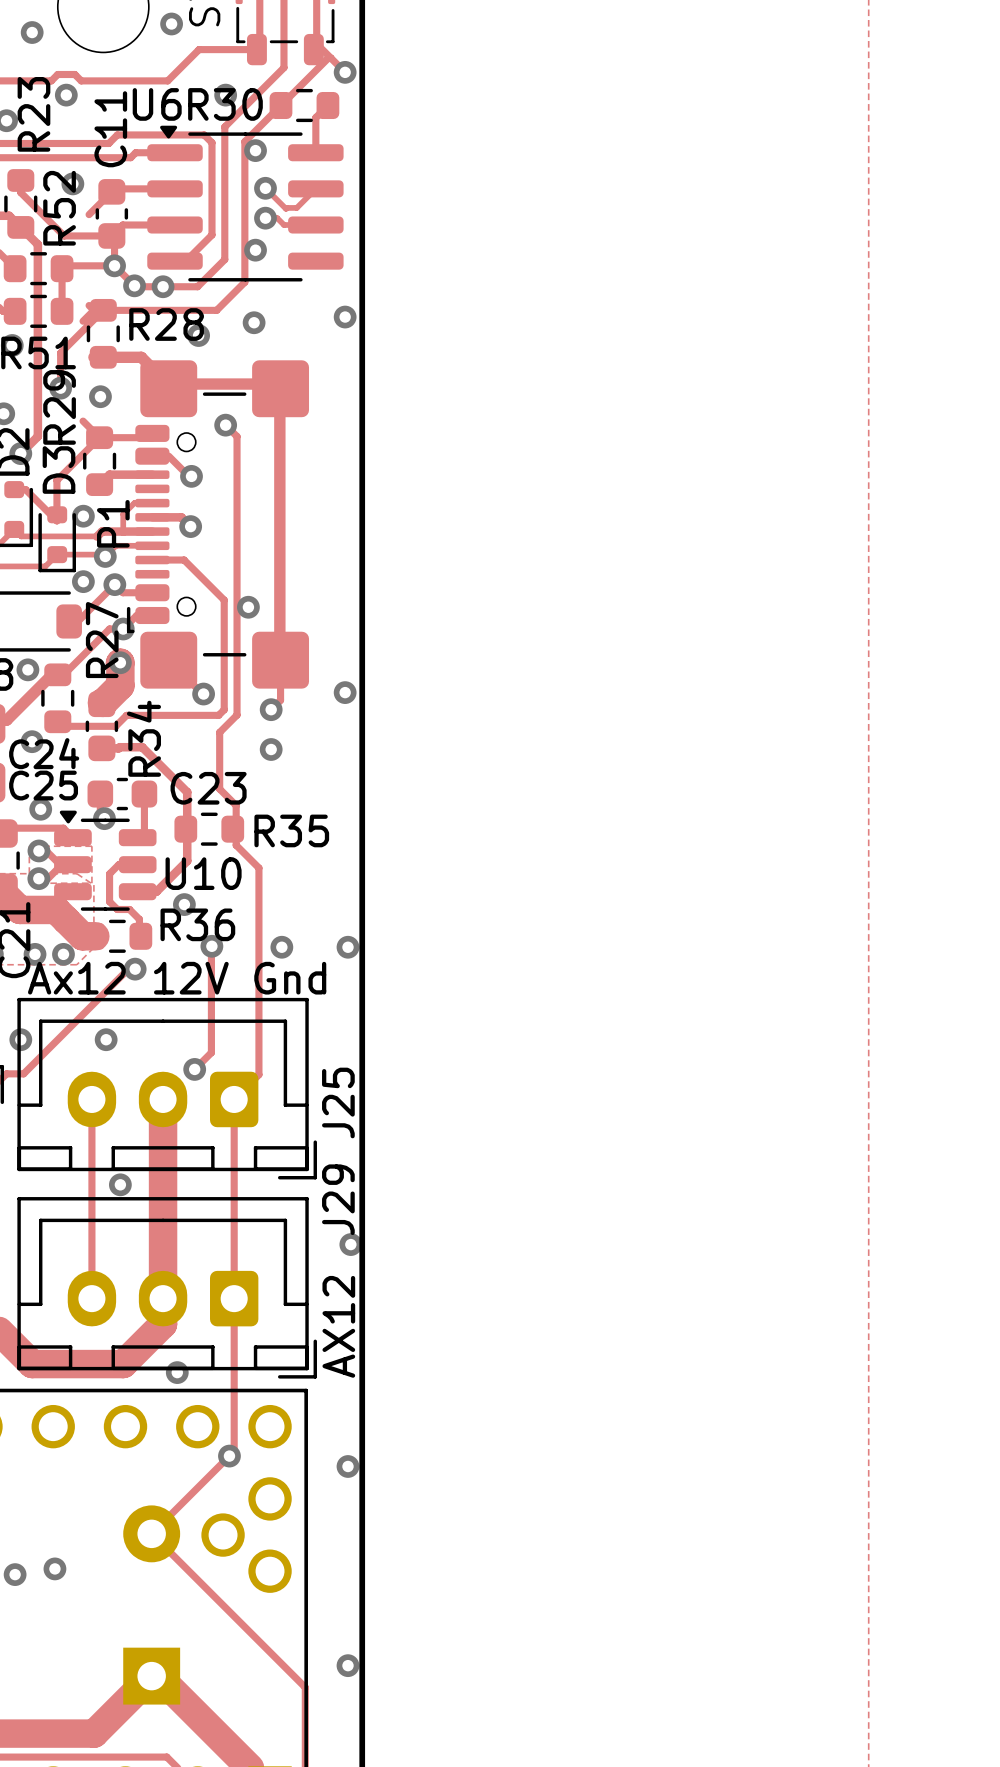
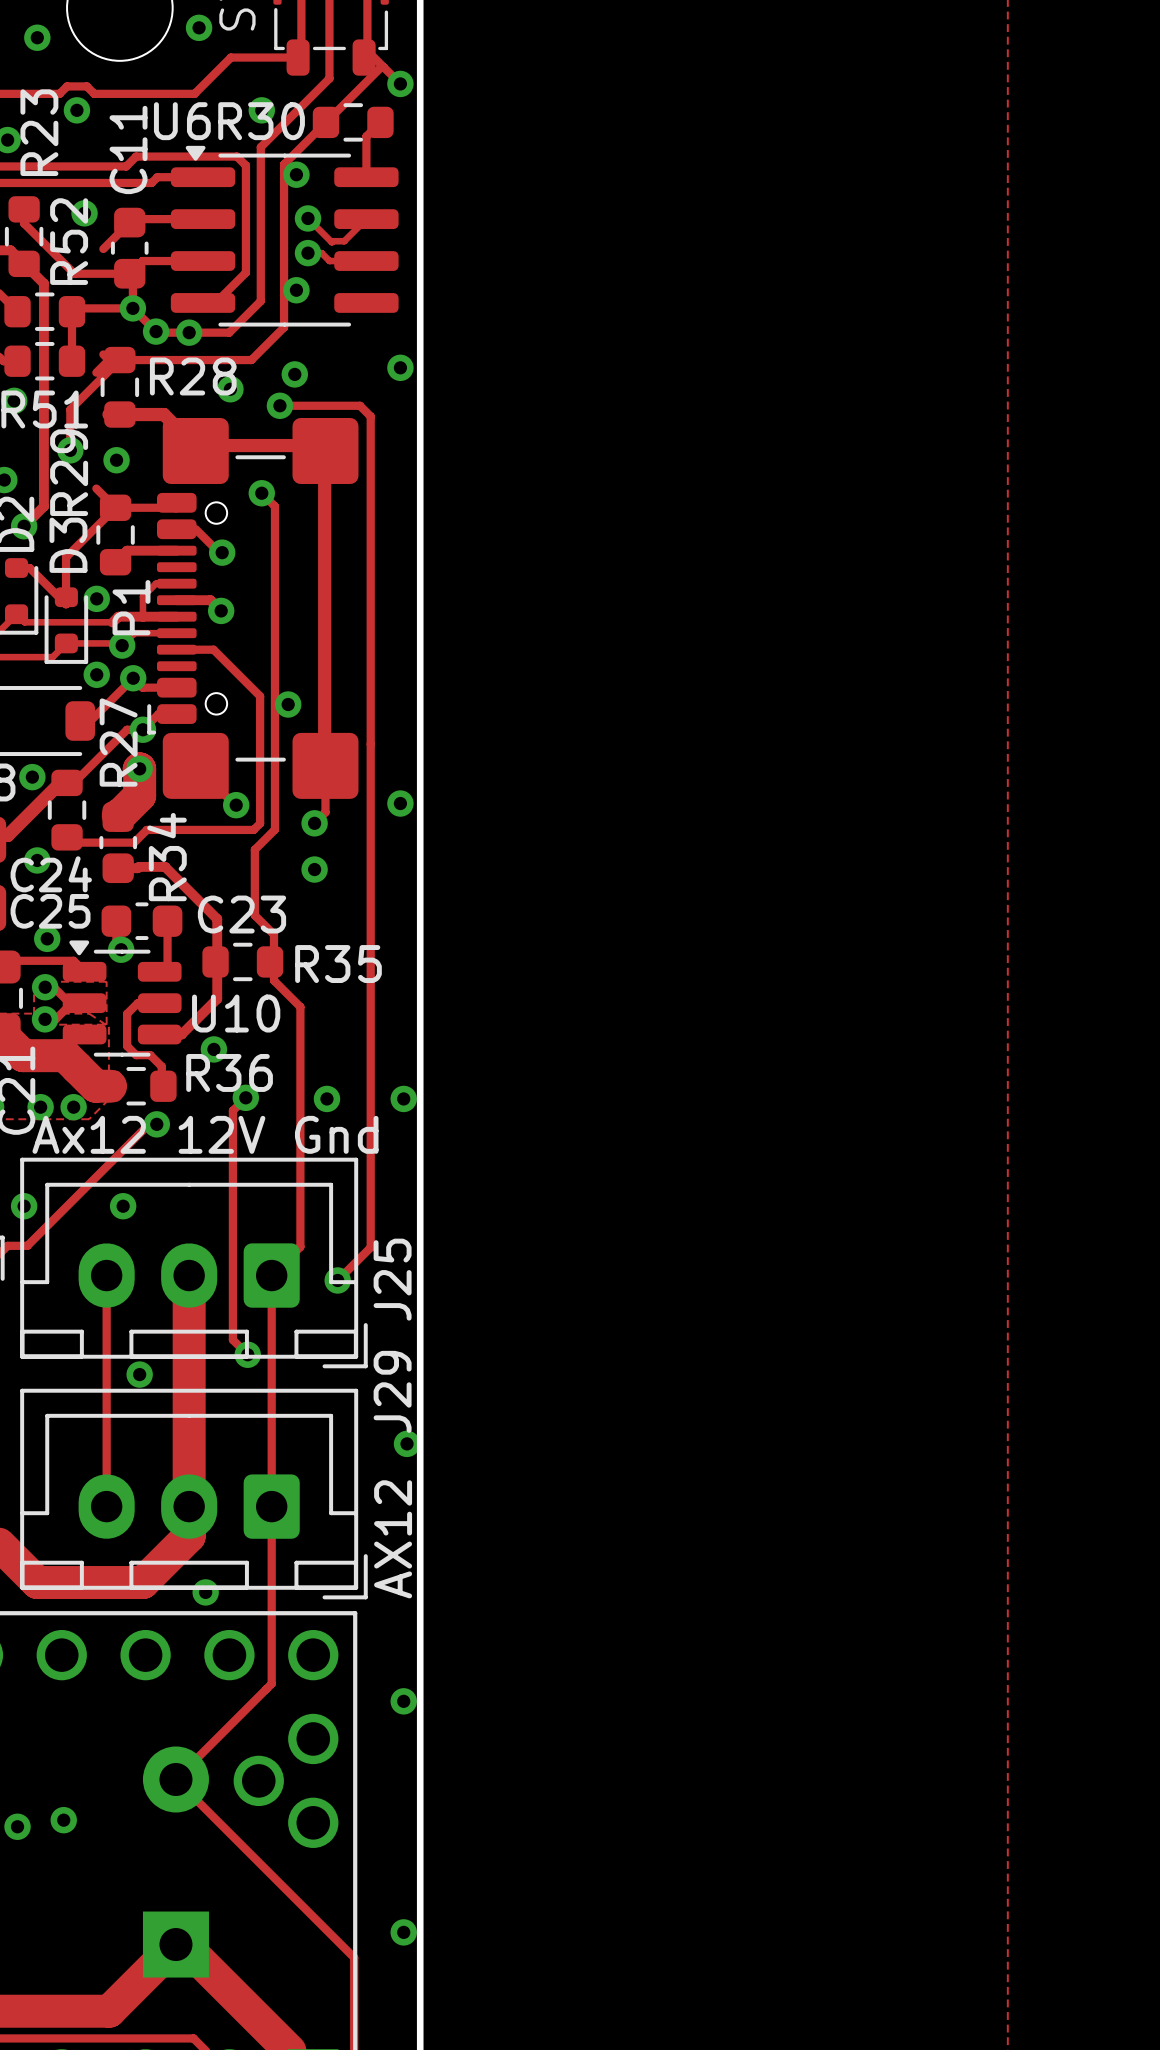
track: none -> (279, 405) (360, 405) (370, 416) (370, 1247) (337, 1280)
via: none -> (279, 405)
track: (211, 946) (211, 1052) (194, 1069) -> (245, 1098) (232, 1110) (232, 1339) (247, 1354)
via: (194, 1069) -> none
via: none -> (337, 1280)
via: none -> (247, 1354)
via: (229, 1456) -> none

